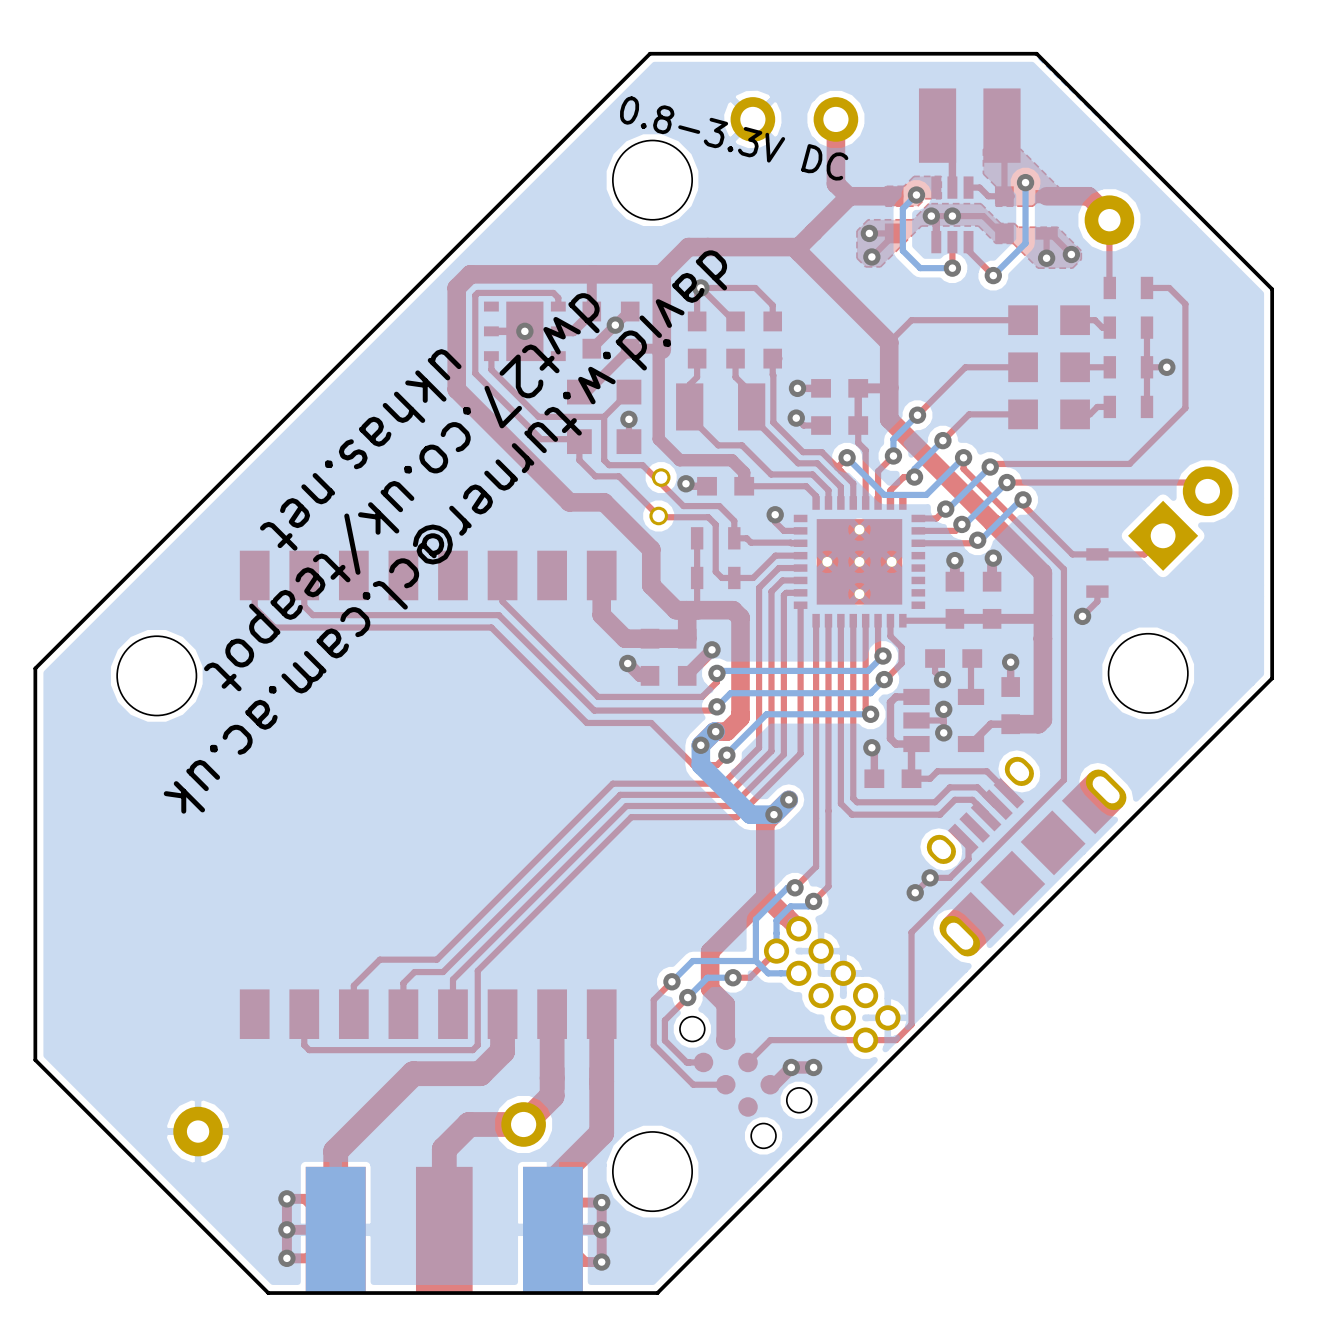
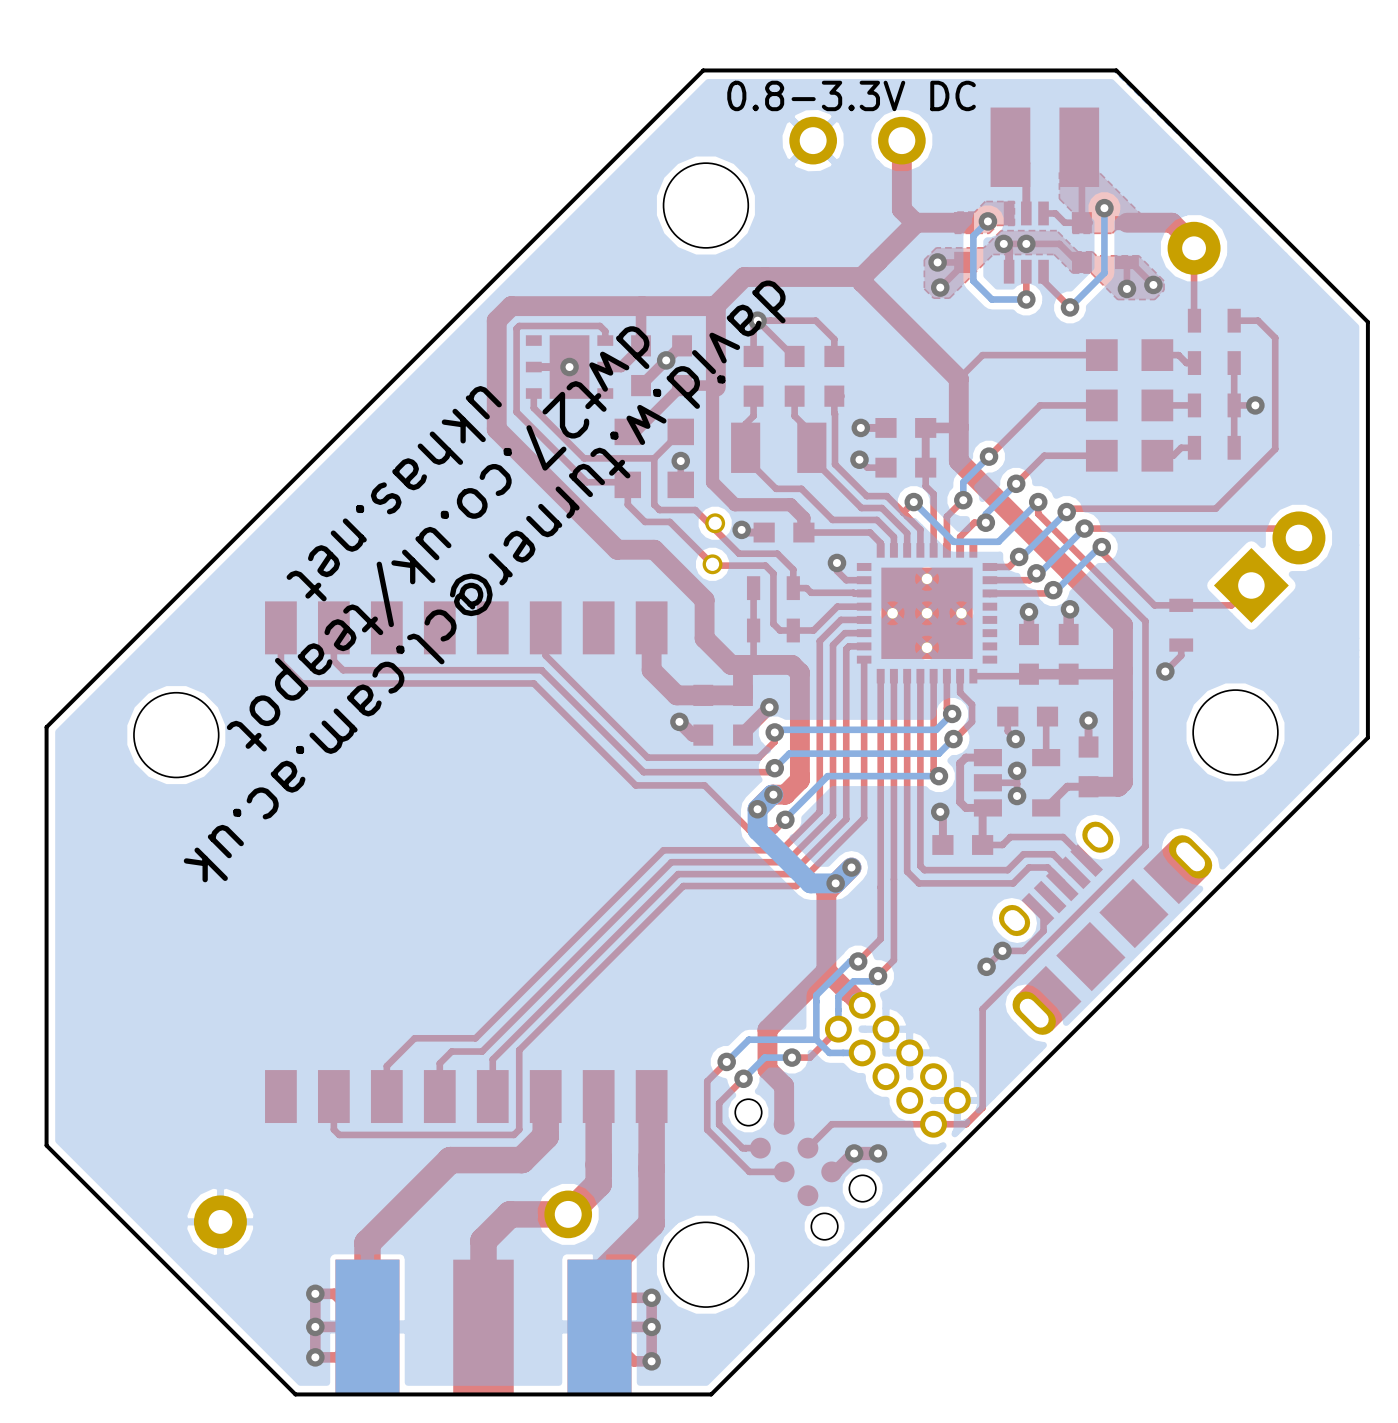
text rotation: 0° (734, 138) -> 15° counterclockwise (851, 95)

